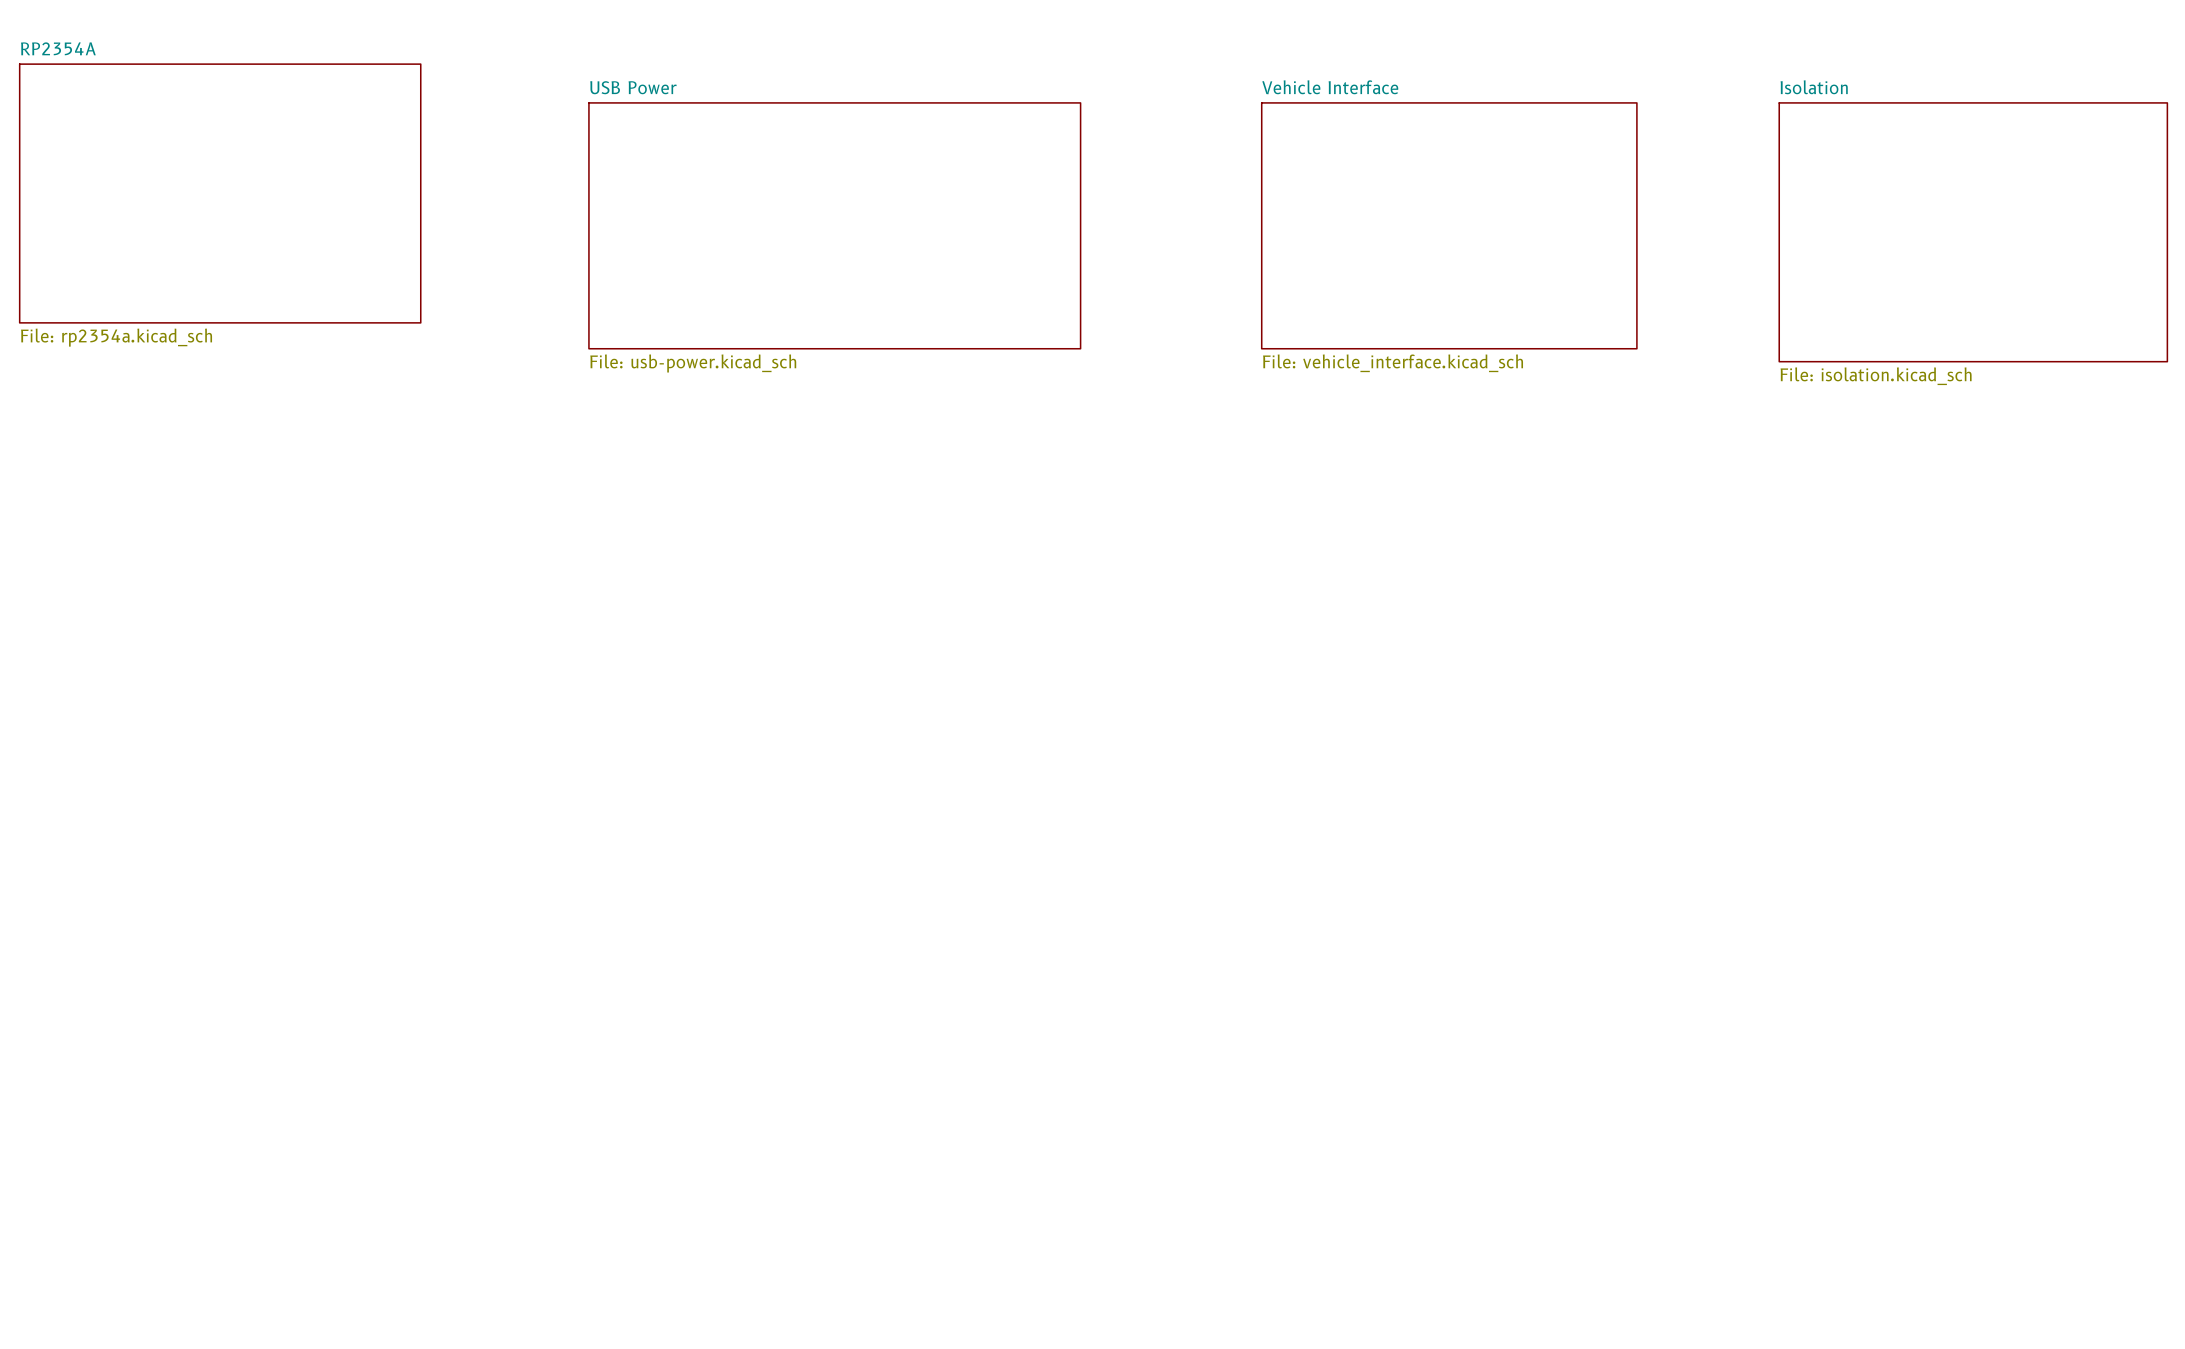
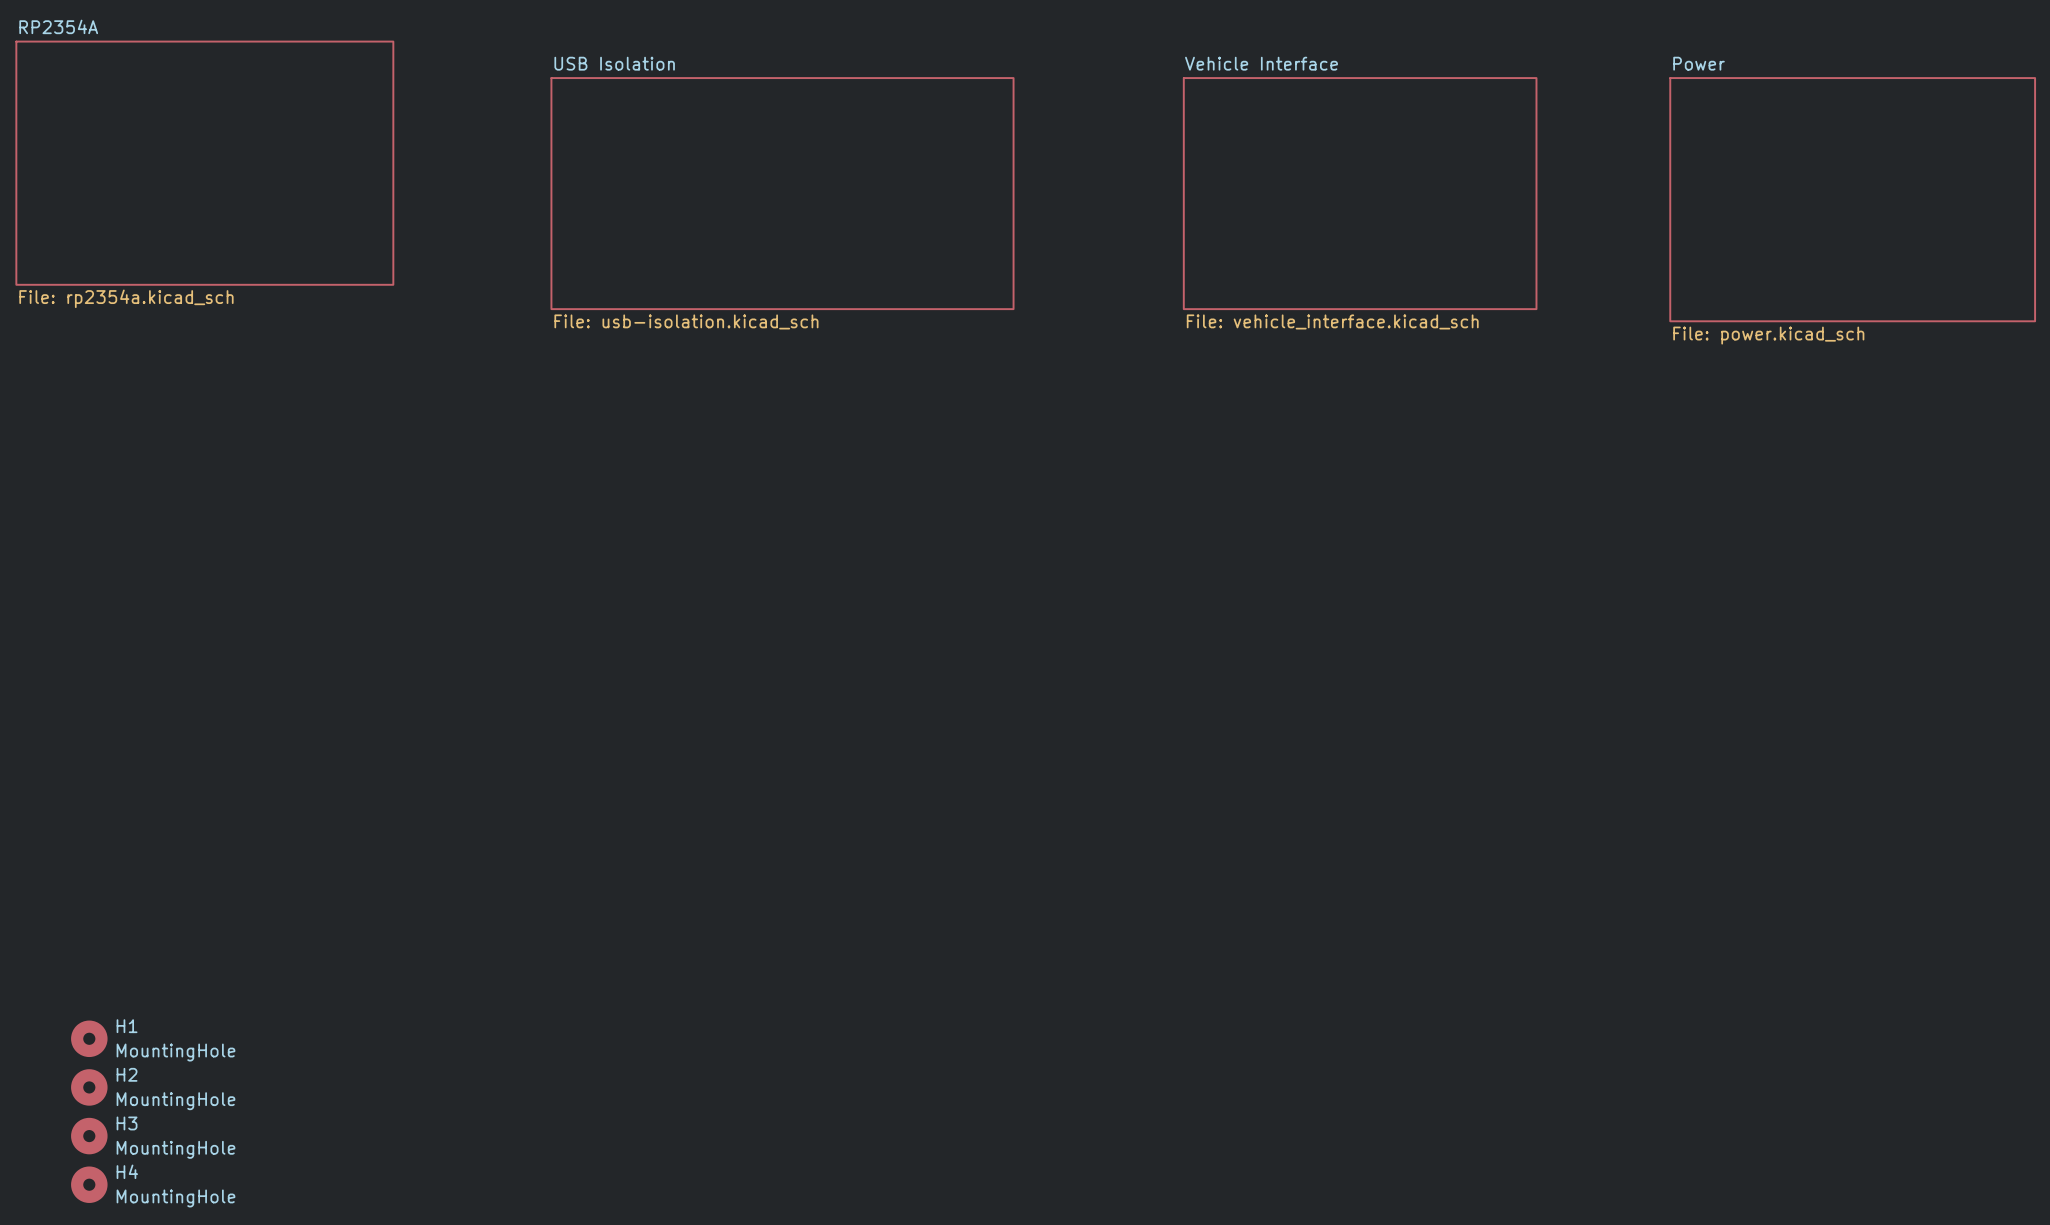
sheet USB Power name: USB Power (633, 87) -> USB Isolation (614, 63)
sheet Isolation name: Isolation (1814, 87) -> Power (1699, 63)
sheet USB Power value: File: usb-power.kicad_sch (693, 363) -> File: usb-isolation.kicad_sch (686, 321)
sheet Isolation value: File: isolation.kicad_sch (1876, 376) -> File: power.kicad_sch (1768, 335)
H1: none -> MountingHole (89, 1038)
H2: none -> MountingHole (89, 1087)
H3: none -> MountingHole (89, 1136)
H4: none -> MountingHole (89, 1184)

